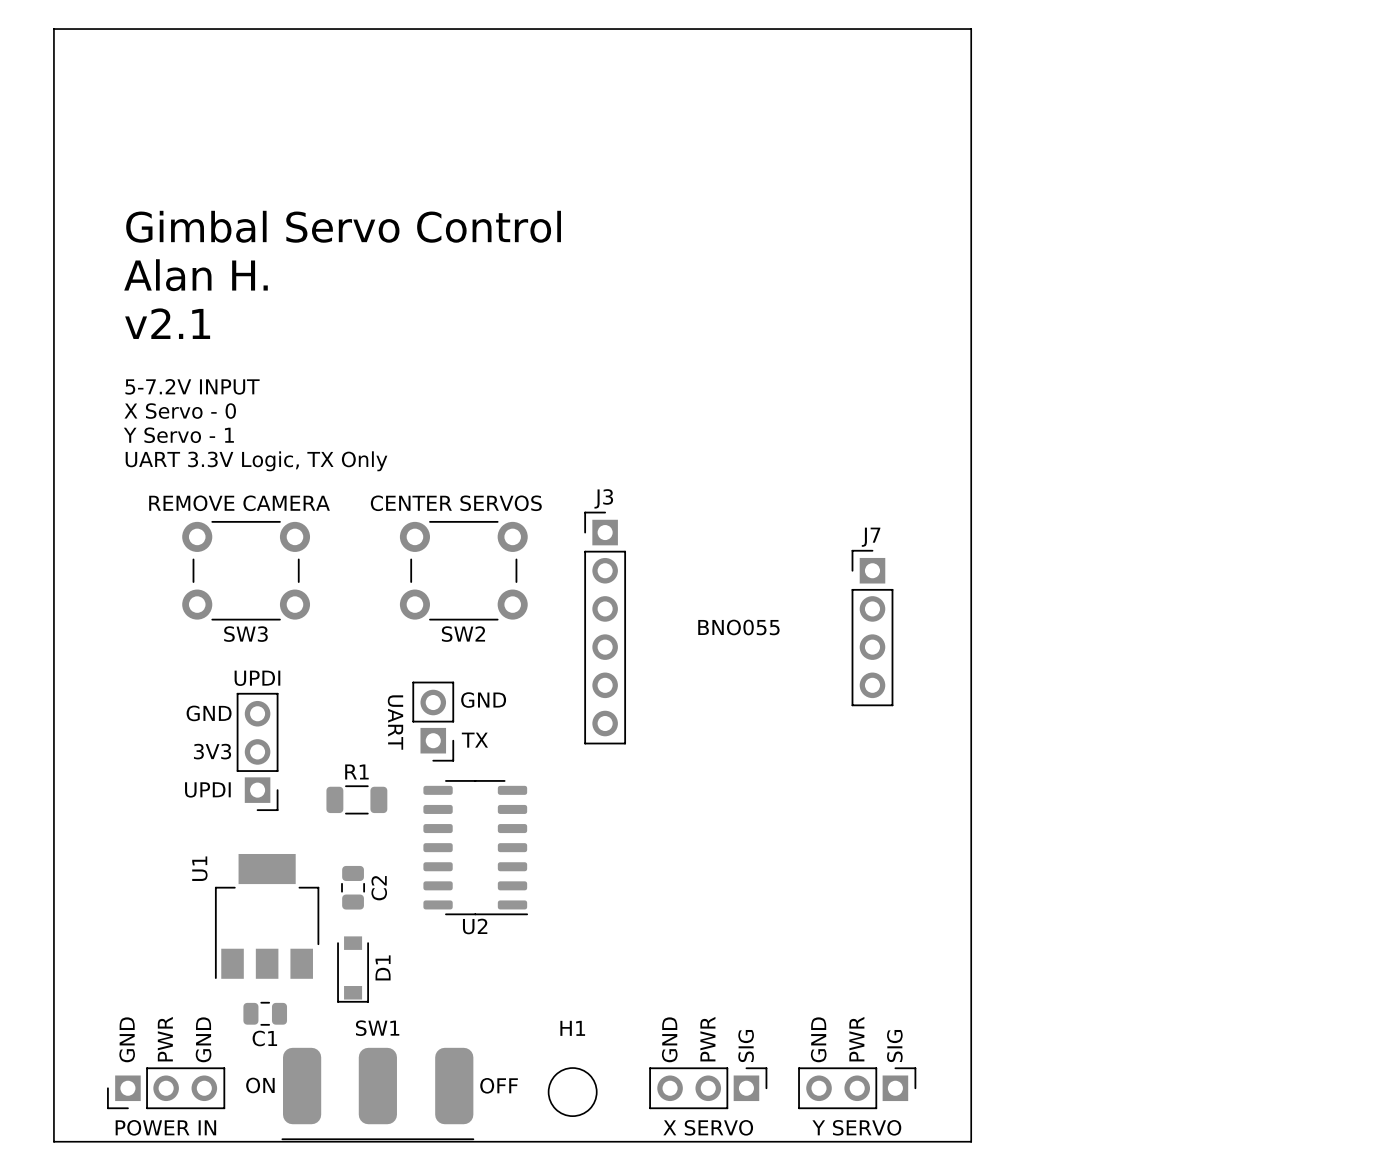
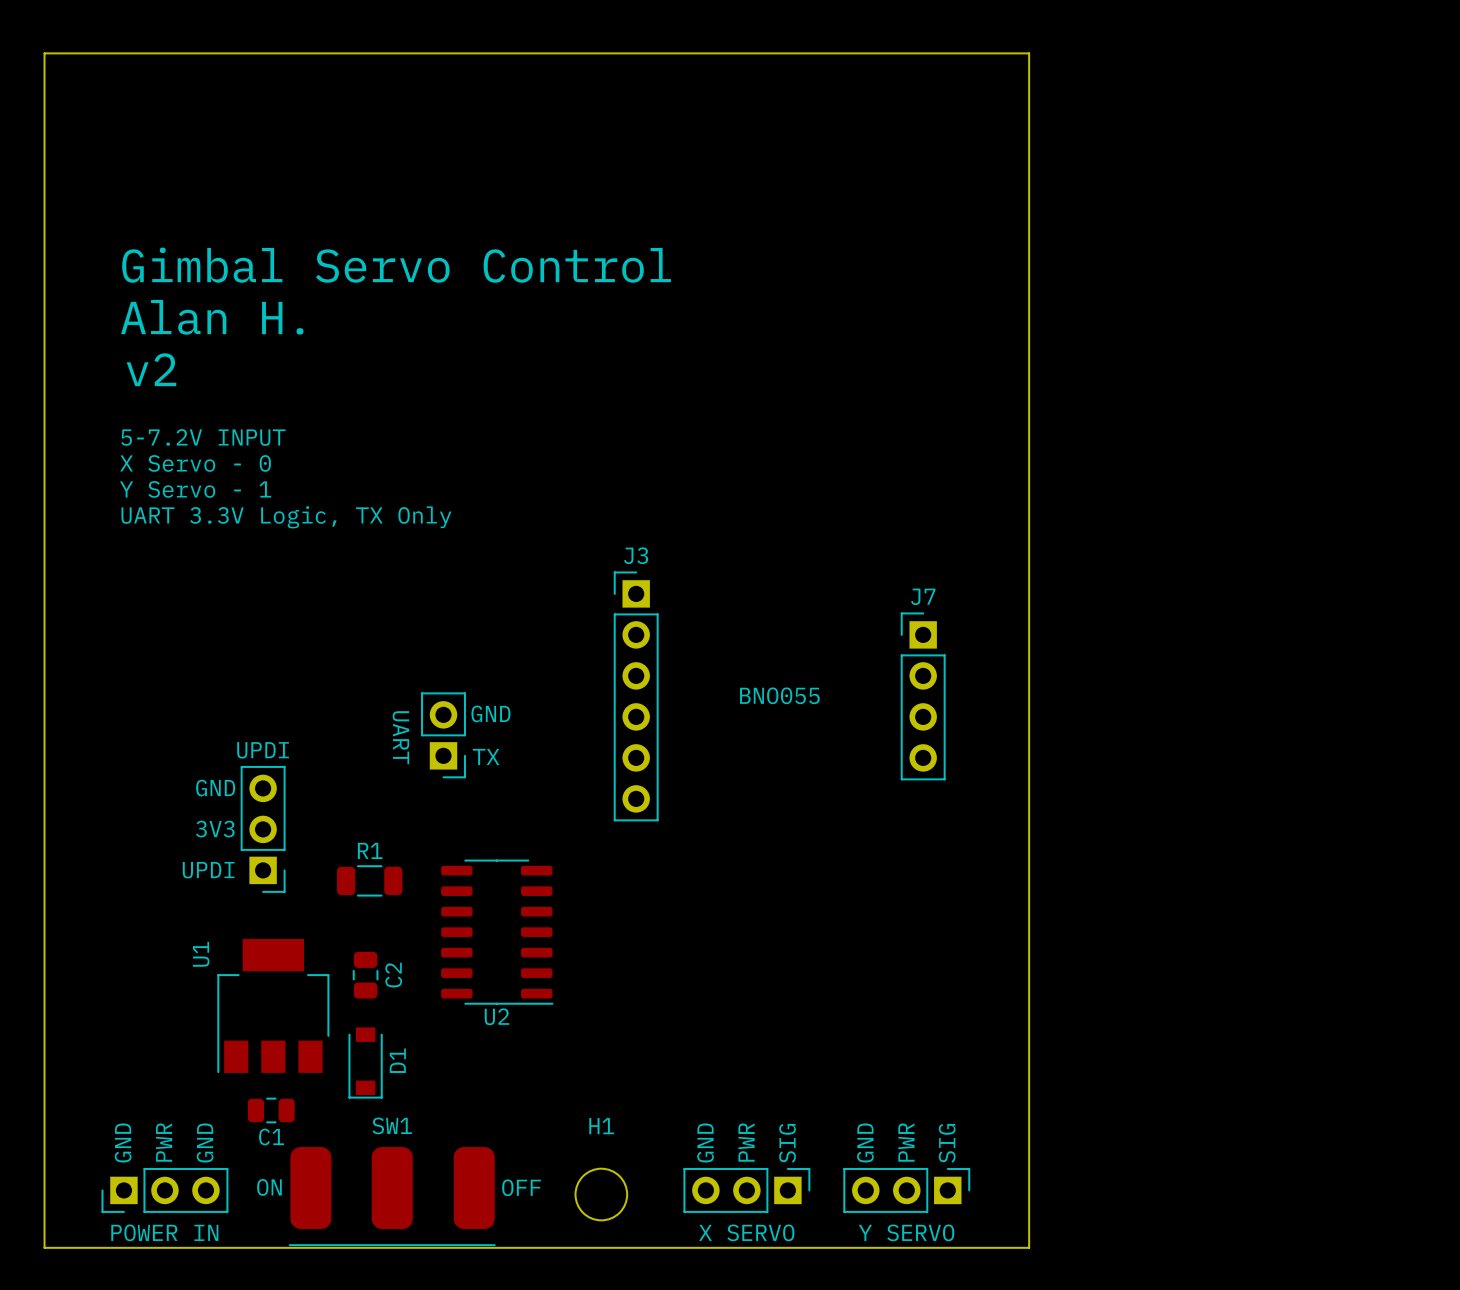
text: v2.1 (167, 323) -> v2 (151, 369)
SW3: REMOVE CAMERA (246, 570) -> none
SW2: CENTER SERVOS (463, 570) -> none
text position: GND (483, 700) -> GND (490, 713)
part position: (433, 721) -> (443, 735)
text position: UART (395, 722) -> UART (400, 737)
text position: TX (474, 740) -> TX (486, 756)

